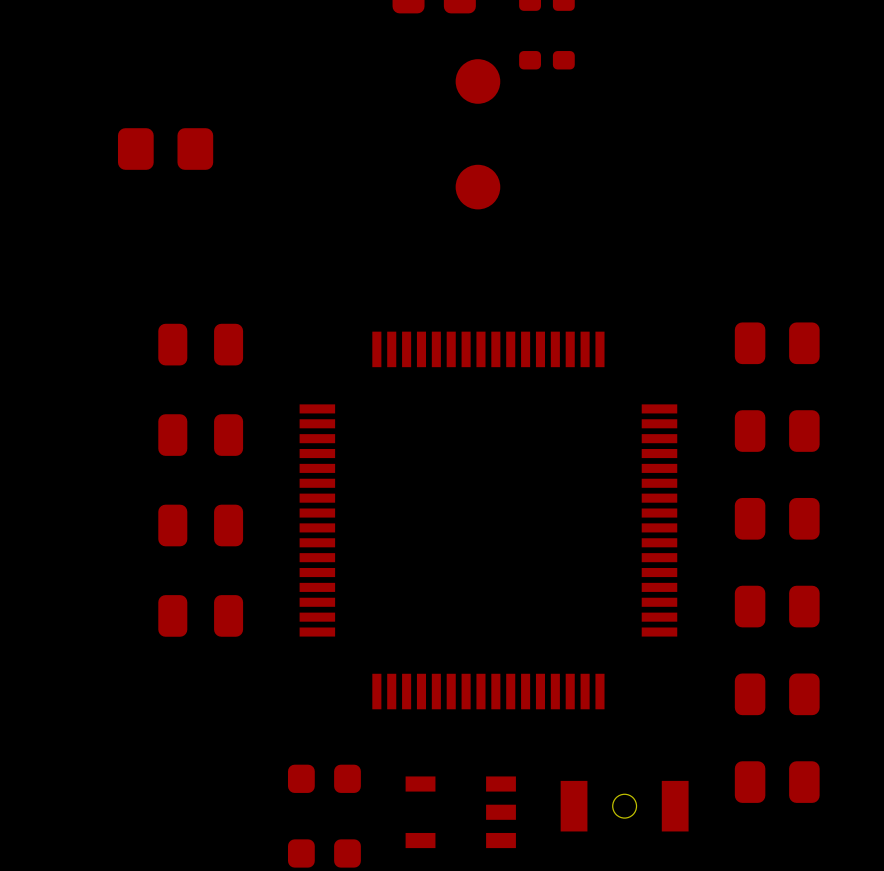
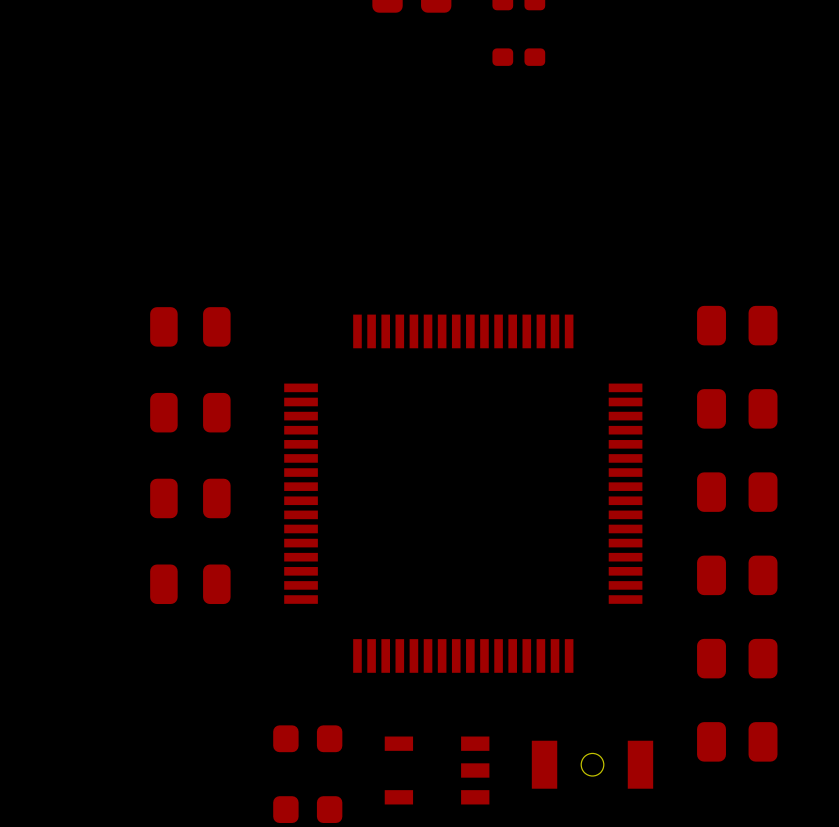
part: (477, 81) -> none
part: (165, 149) -> none
part: (477, 187) -> none

